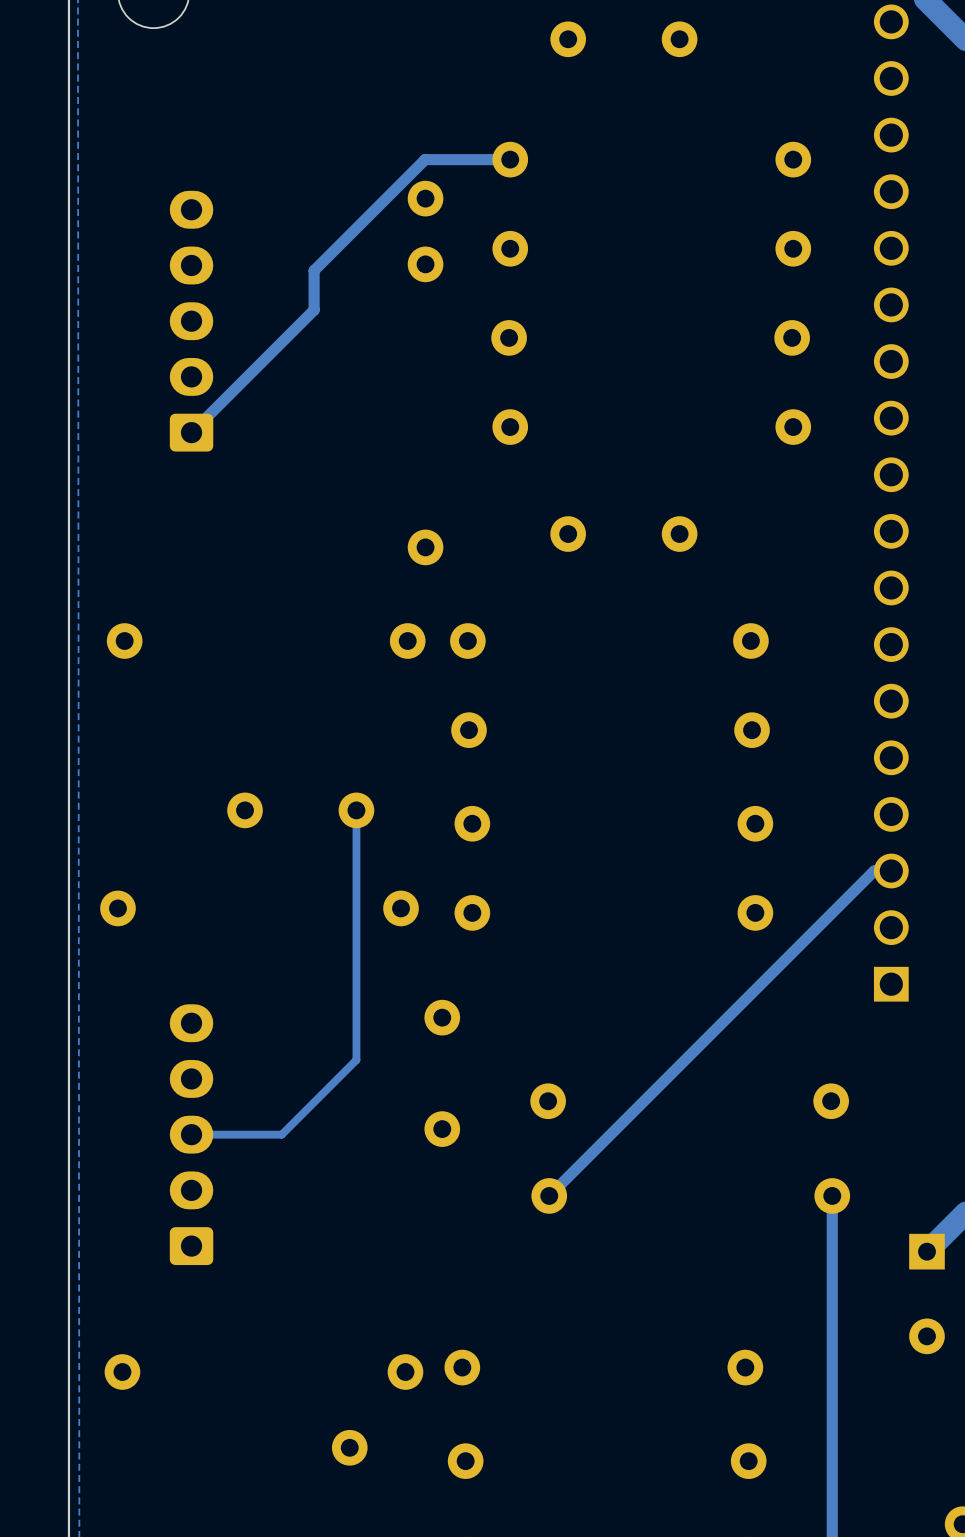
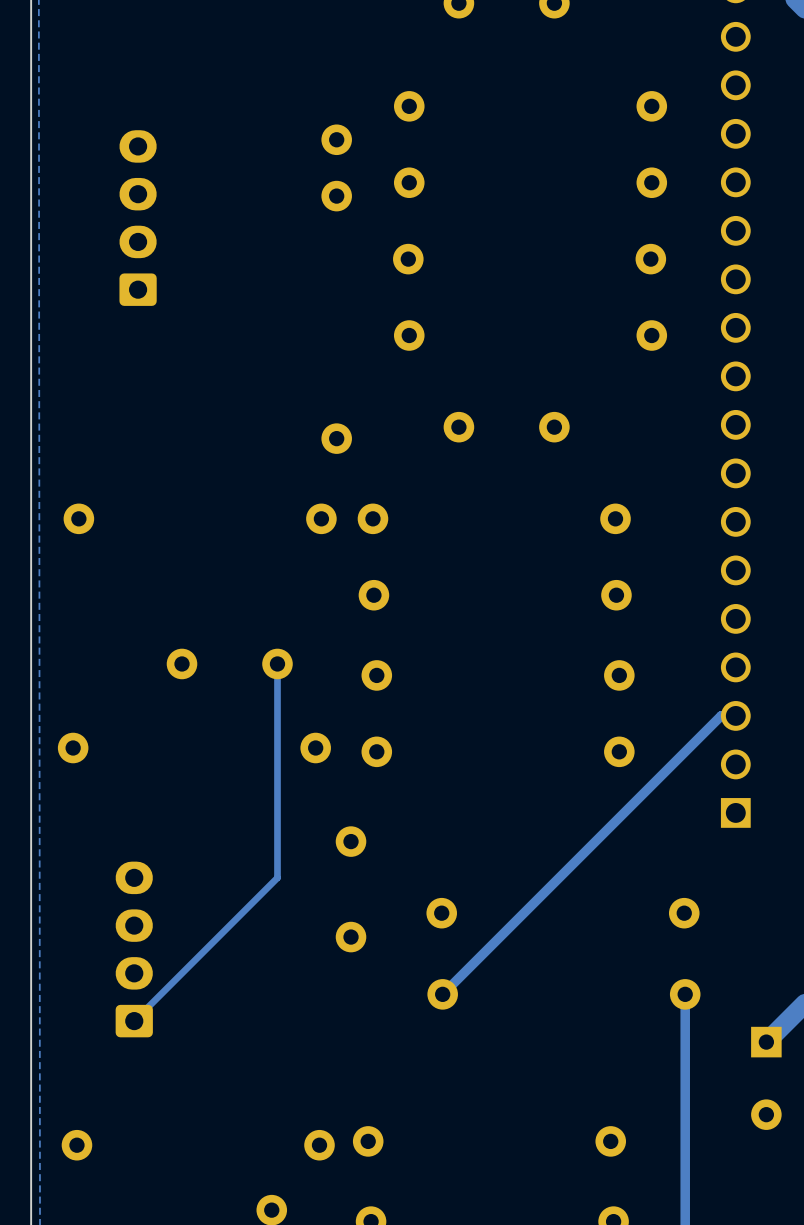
track: (510, 159) (425, 159) (314, 270) (314, 310) (191, 432) -> none
part: none -> (138, 218)
part: (191, 321) -> none
part footprint: [169, 1004, 214, 1266] -> [115, 861, 153, 1038]
track: (281, 1134) (191, 1134) -> (213, 941) (134, 1021)

